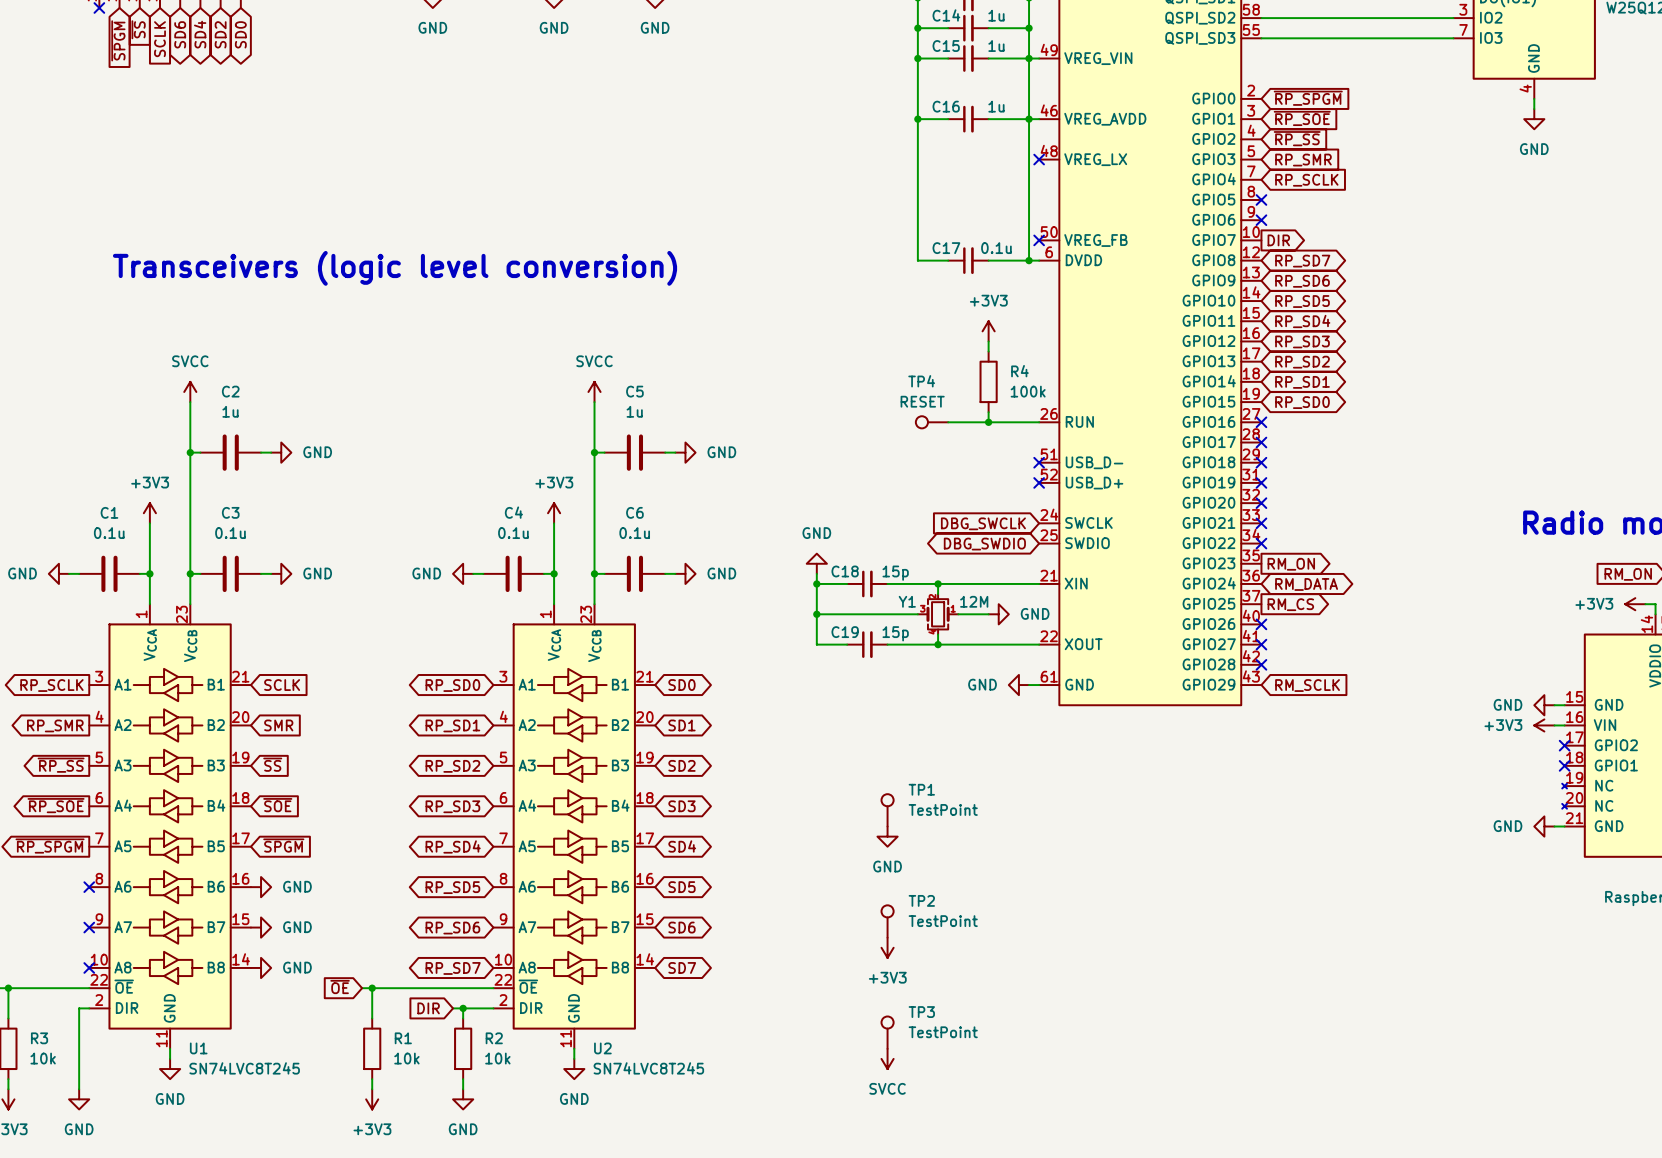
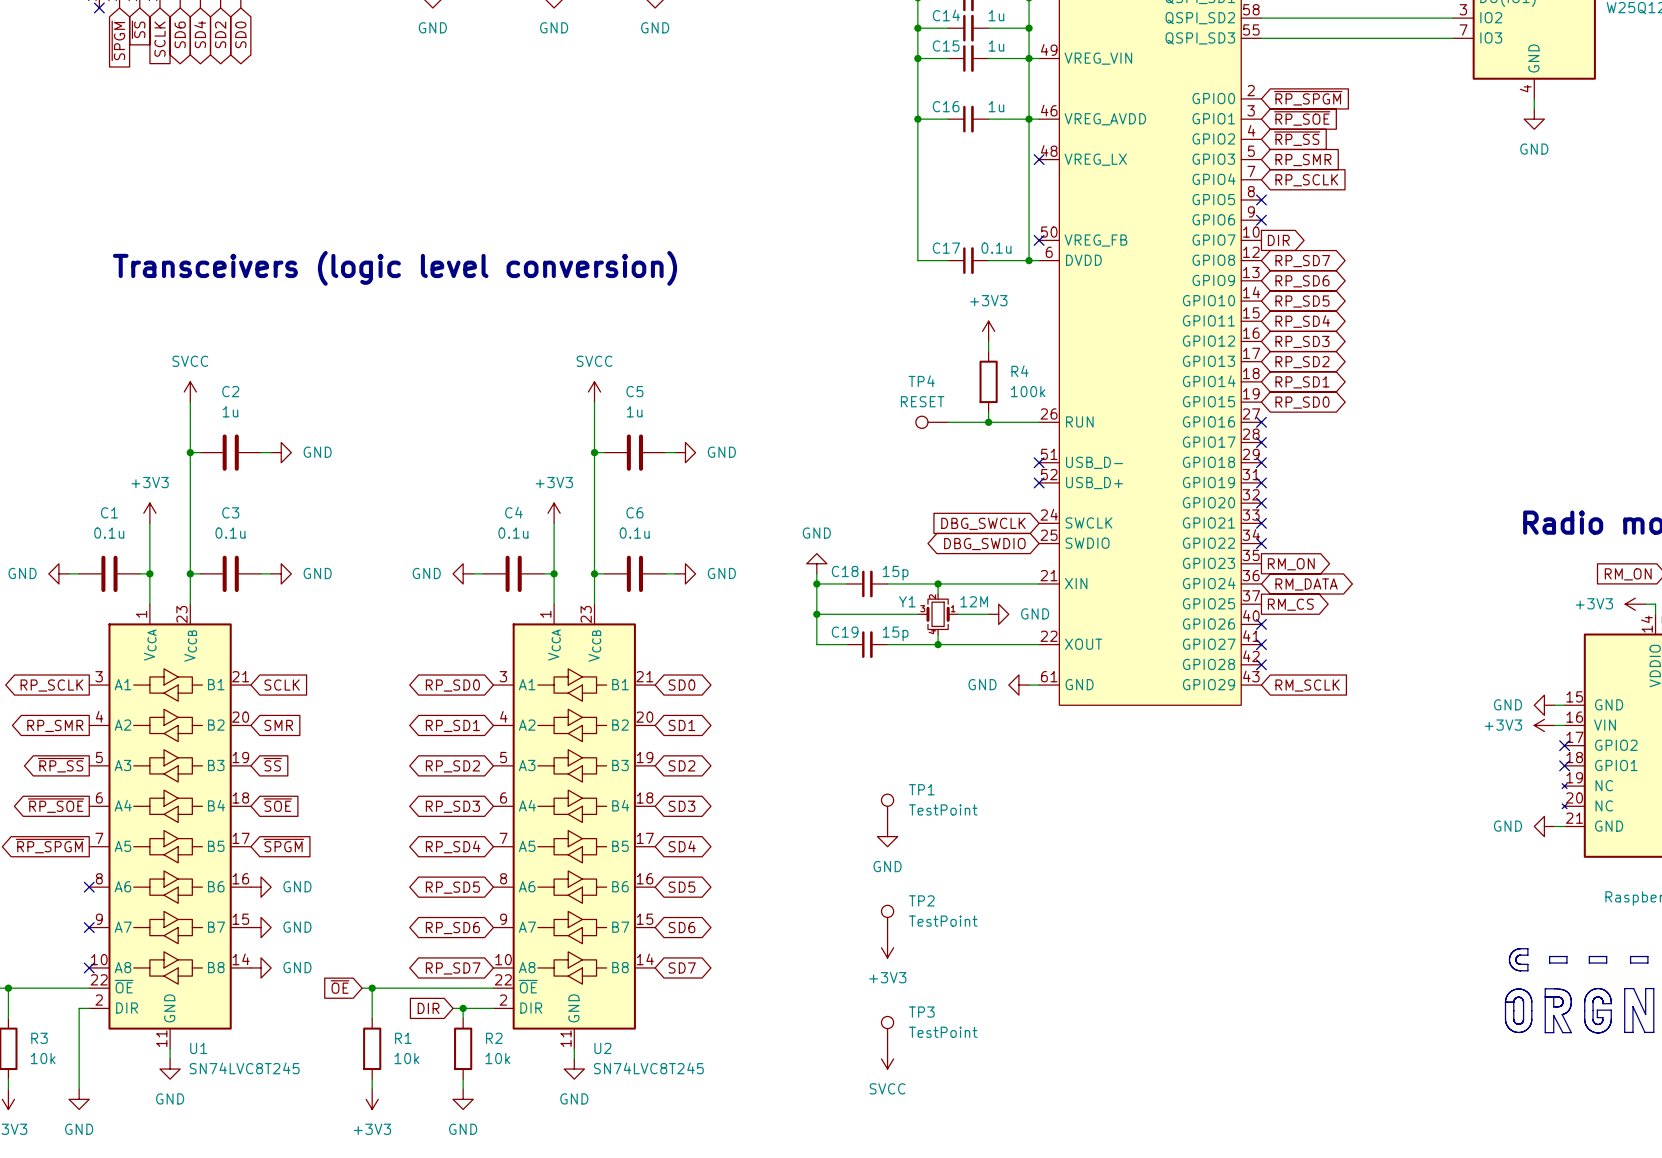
line: none -> (1519, 948) (1511, 953) (1510, 963) (1516, 969) (1527, 970) (1527, 964) (1519, 964) (1516, 961) (1518, 955) (1527, 955) (1527, 948) (1519, 948)
line: none -> (1549, 956) (1566, 956) (1566, 963) (1549, 963) (1549, 956)
line: none -> (1589, 956) (1606, 956) (1606, 963) (1589, 963) (1589, 956)
line: none -> (1630, 956) (1630, 963) (1647, 963) (1647, 956) (1630, 956)
line: none -> (1545, 988) (1545, 1032) (1553, 1032) (1553, 1015) (1562, 1032) (1571, 1032) (1562, 1014) (1570, 1007) (1569, 994) (1561, 989) (1545, 988)
line: none -> (1597, 988) (1590, 990) (1585, 996) (1584, 1019) (1588, 1028) (1598, 1032) (1604, 1031) (1609, 1026) (1611, 1010) (1597, 1010) (1597, 1017) (1602, 1017) (1602, 1020) (1600, 1023) (1595, 1023) (1593, 1019) (1593, 1000) (1598, 997) (1602, 999) (1602, 1003) (1611, 1002) (1606, 992) (1597, 988)
line: none -> (1624, 988) (1633, 988) (1645, 1014) (1645, 988) (1653, 988) (1653, 1032) (1644, 1032) (1632, 1006) (1632, 1032) (1624, 1032) (1624, 988)
line: none -> (1545, 996) (1556, 996) (1557, 996) (1560, 997) (1562, 1000) (1561, 1005) (1553, 1007) (1553, 996)
line: none -> (1505, 1002) (1505, 1020) (1508, 1027) (1516, 1032) (1526, 1029) (1531, 1020) (1531, 1000) (1529, 994) (1522, 989) (1514, 989) (1508, 994) (1505, 1002)
line: none -> (1513, 1002) (1513, 1020) (1520, 1024) (1523, 1020) (1523, 1000) (1518, 997) (1513, 1002)

